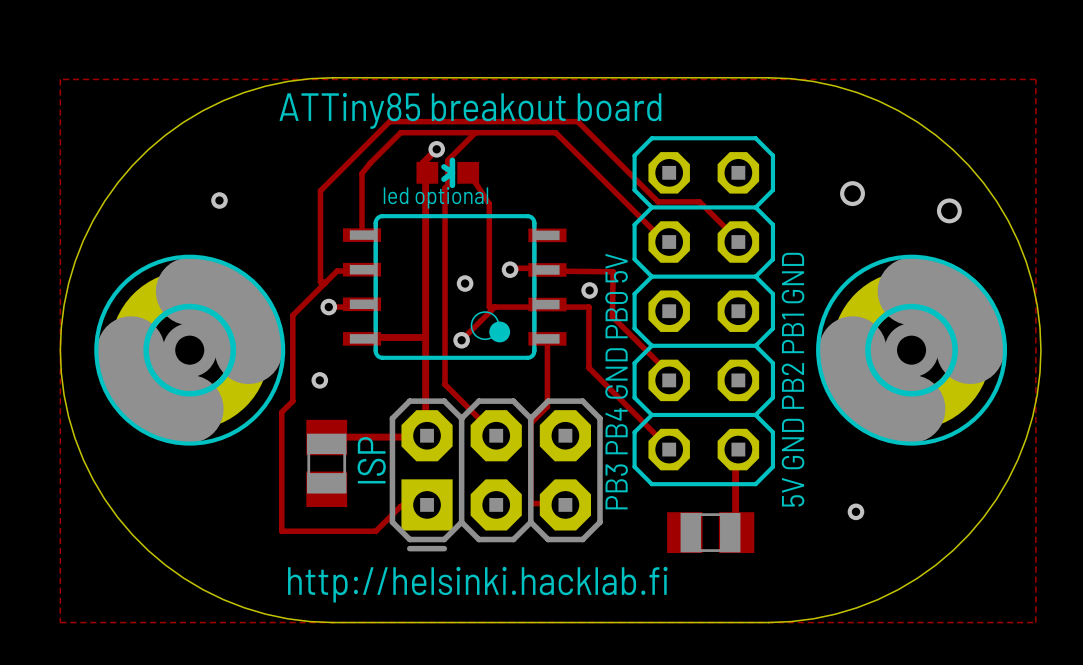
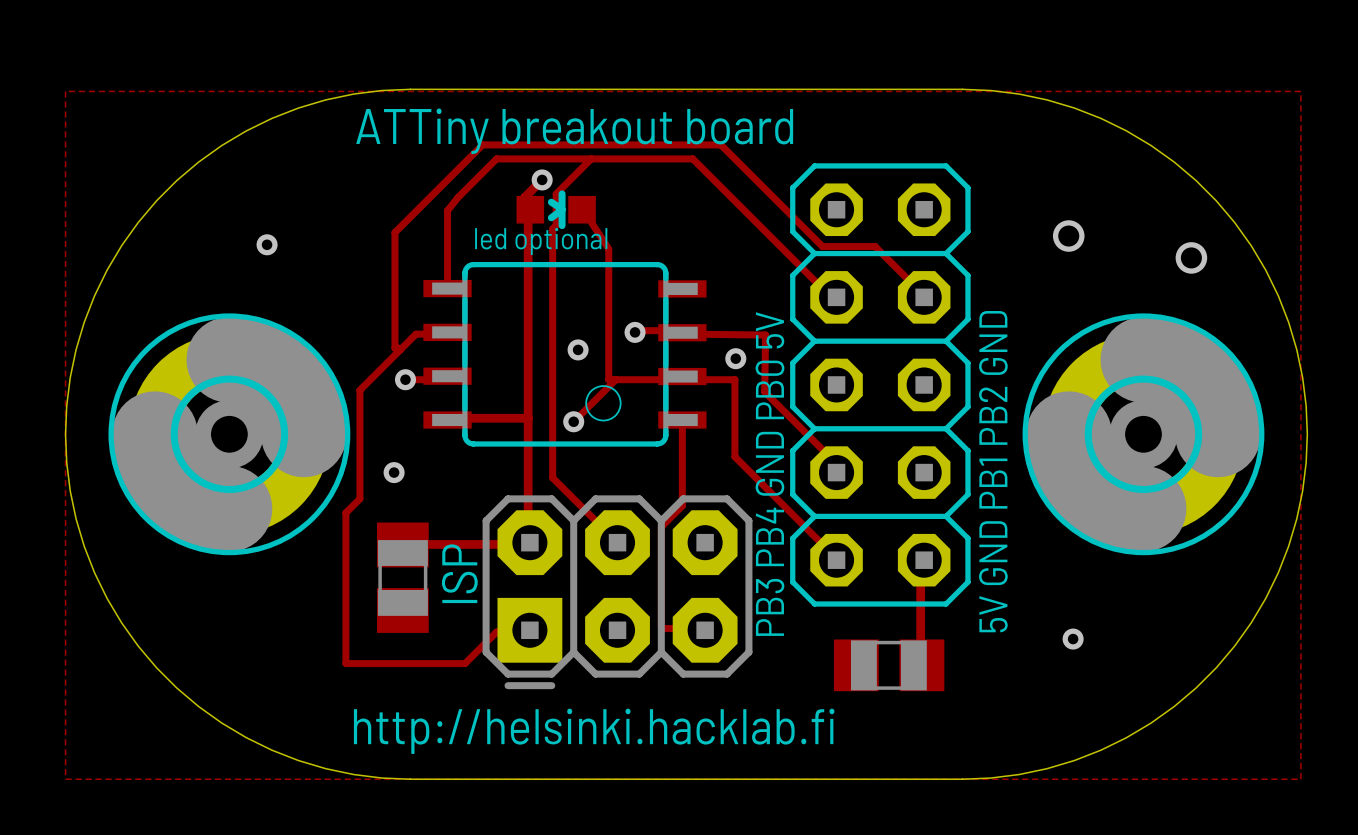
text: ATTiny85 breakout board (470, 110) -> ATTiny breakout board (574, 131)
drawing: [489, 321, 511, 343] -> none
text: 5V GND PB2 PB1 GND (793, 379) -> 5V GND PB1 PB2 GND (993, 471)

